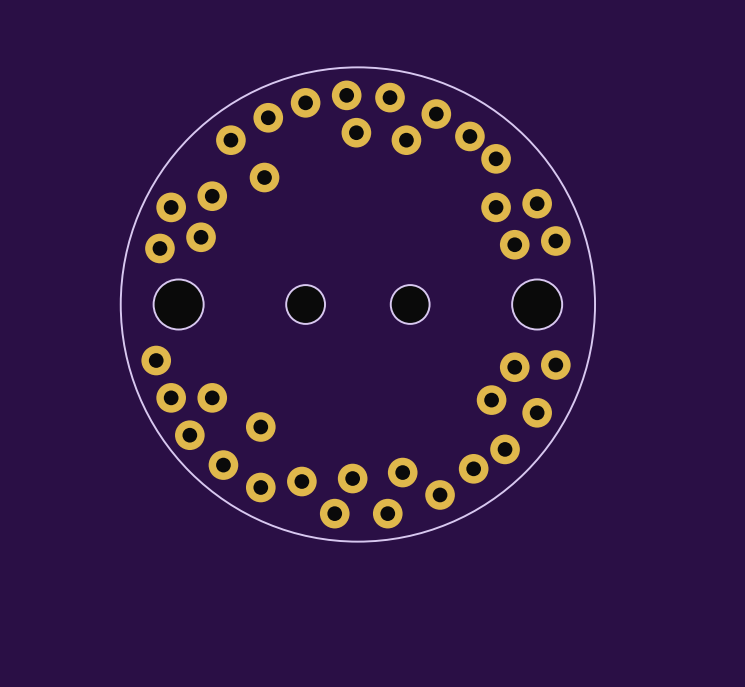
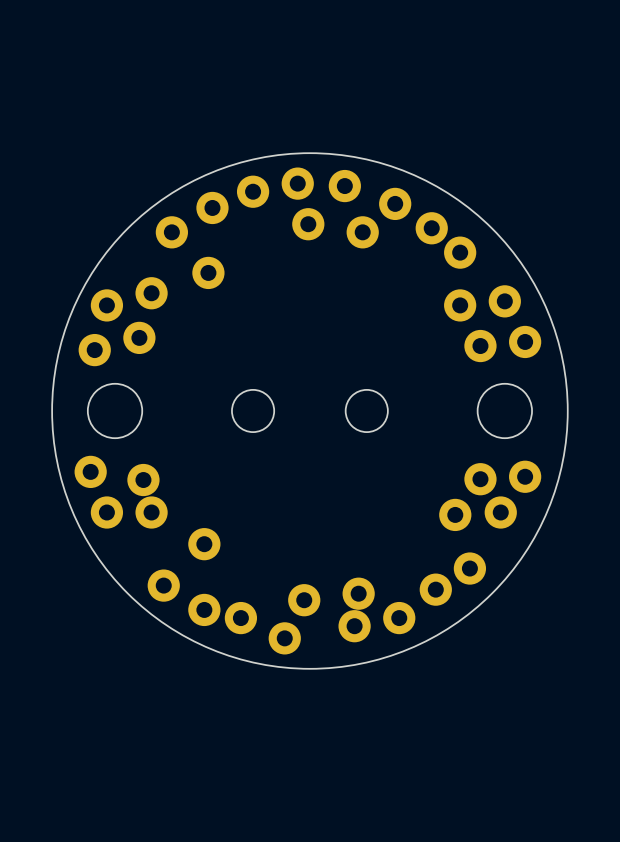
part position: (537, 412) -> (500, 512)
part position: (189, 435) -> (143, 480)
part position: (301, 481) -> (240, 618)
part position: (387, 513) -> (354, 626)

